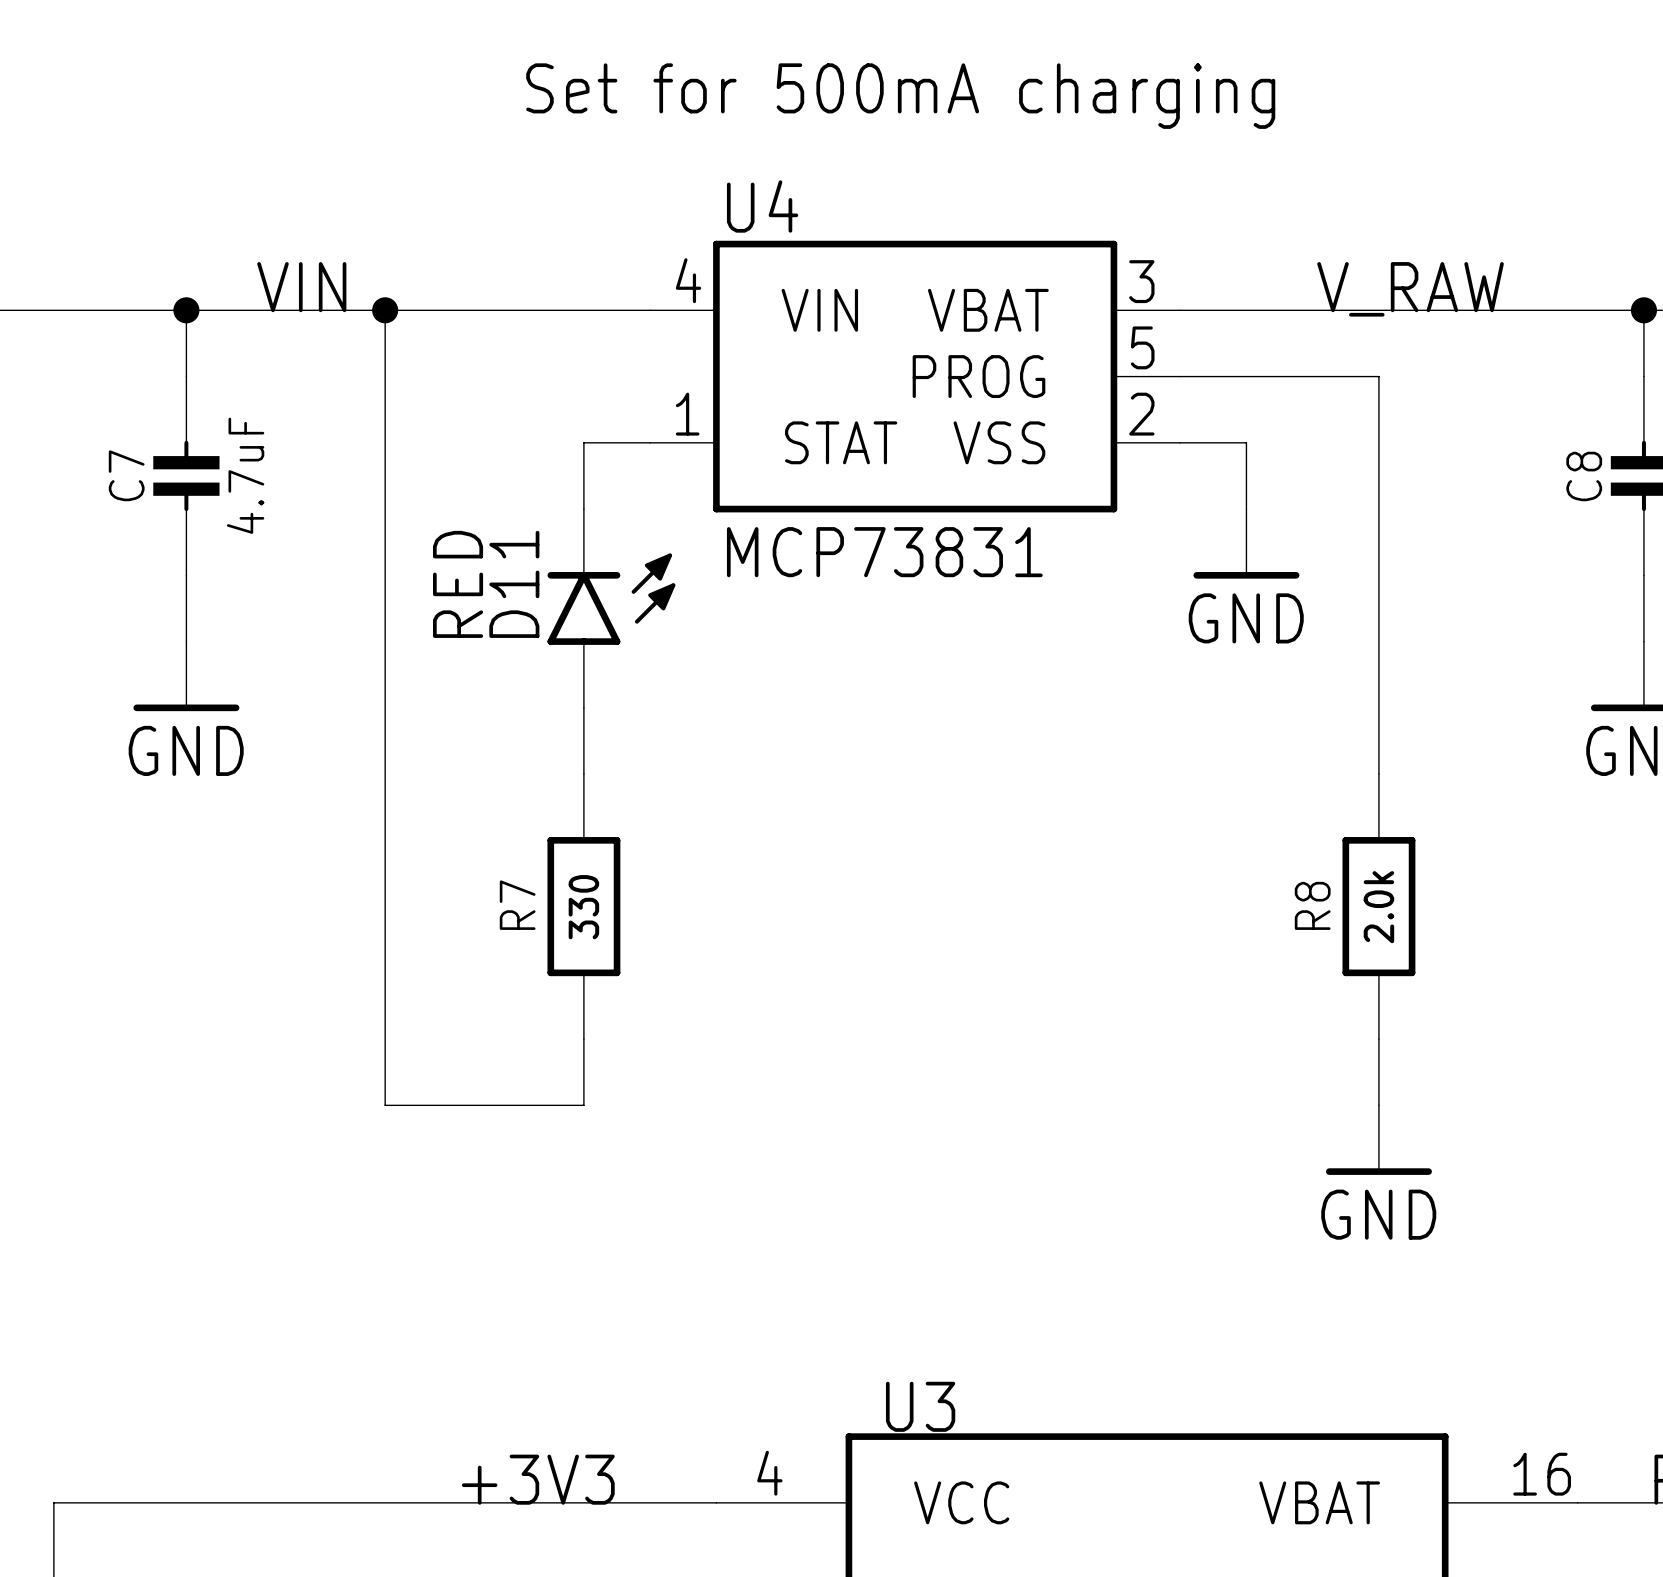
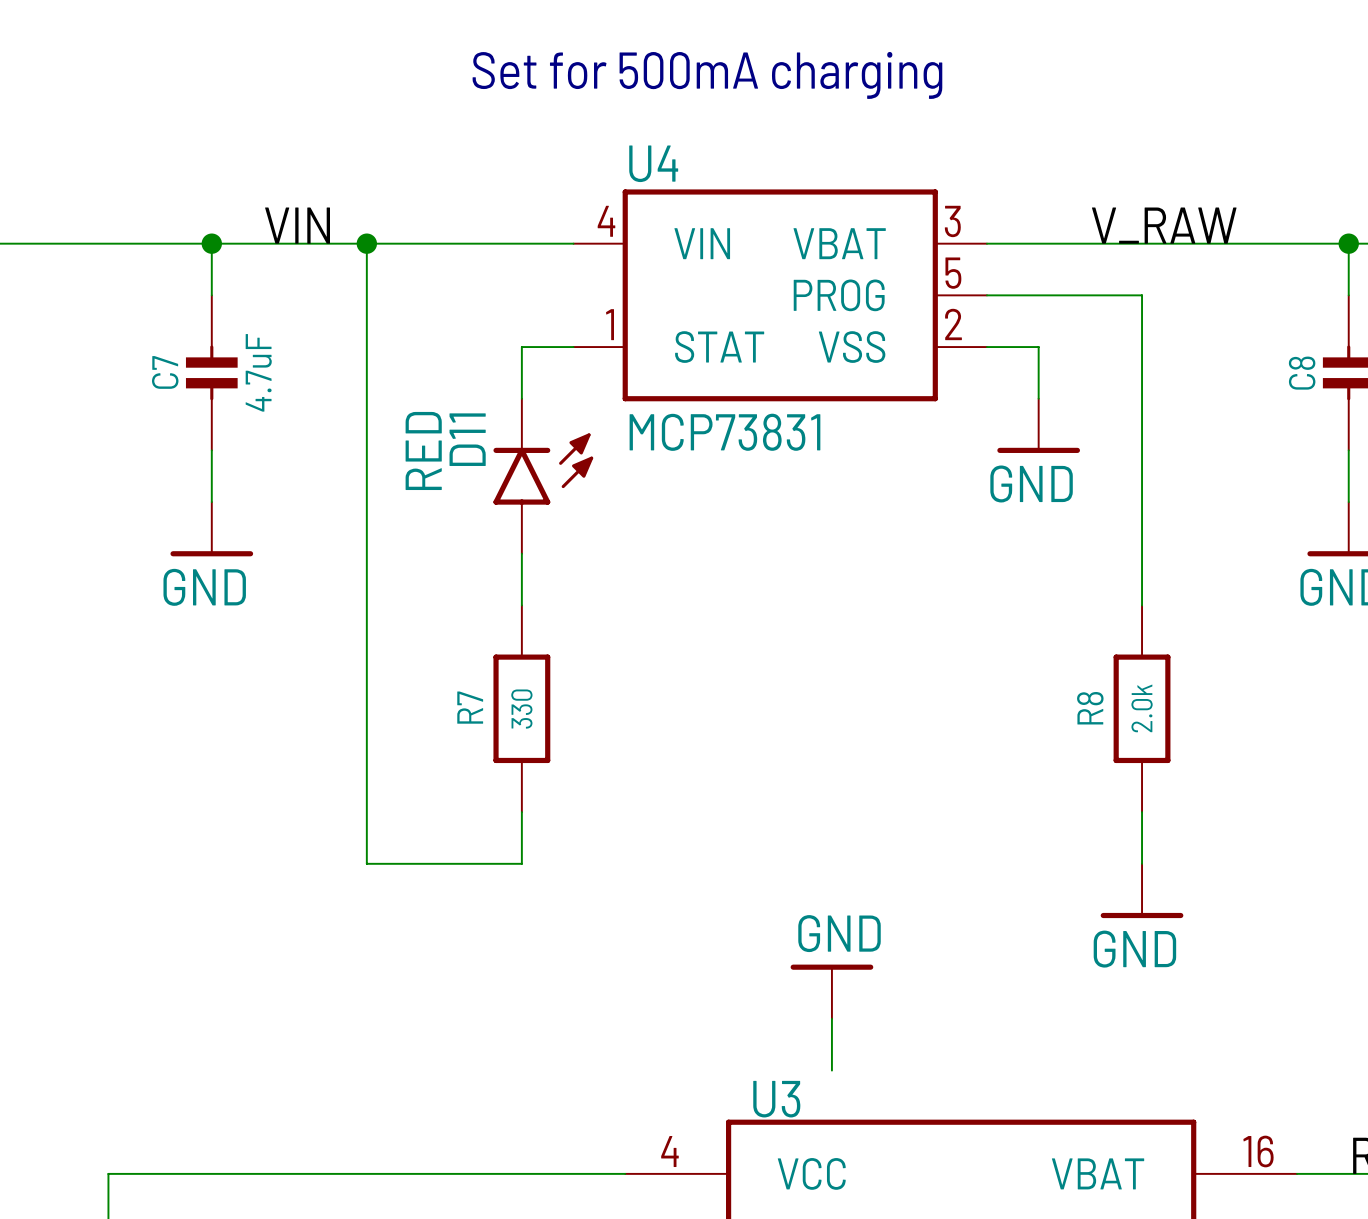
power symbol: none -> GND (831, 991)
wire: none -> (831, 1018) (831, 1070)
label: +3V3 (538, 1479) -> none

